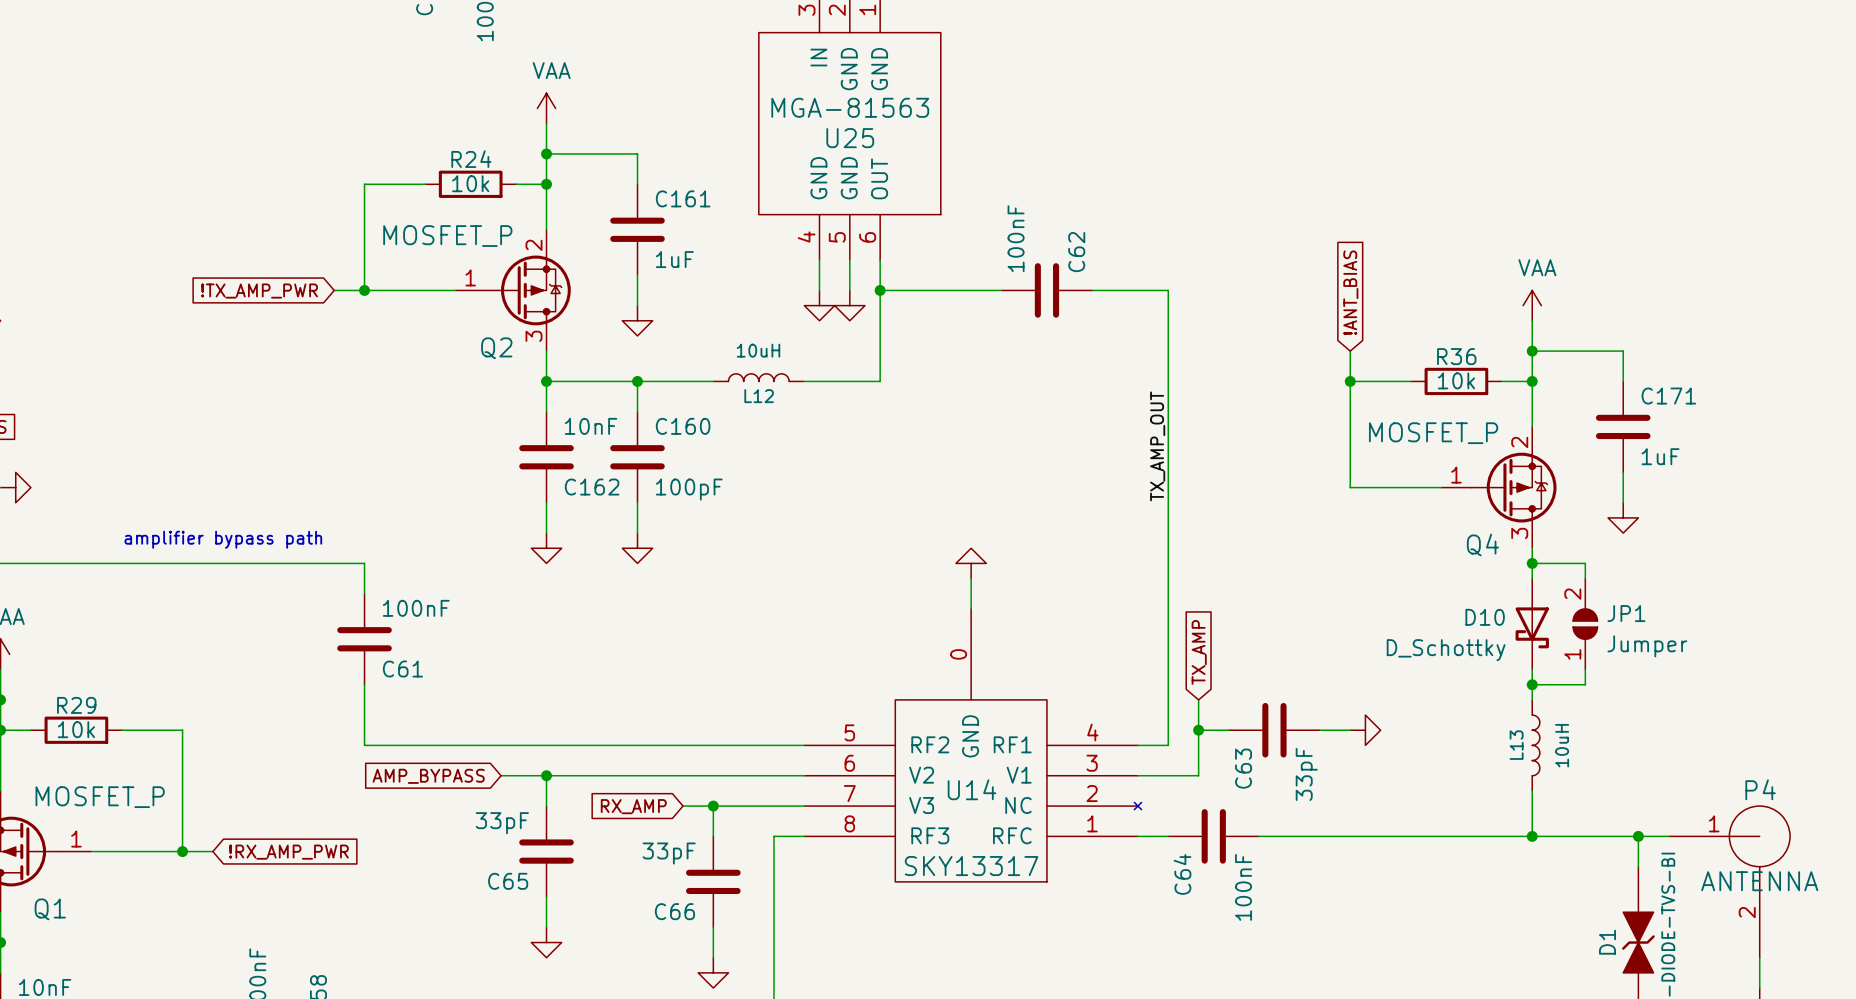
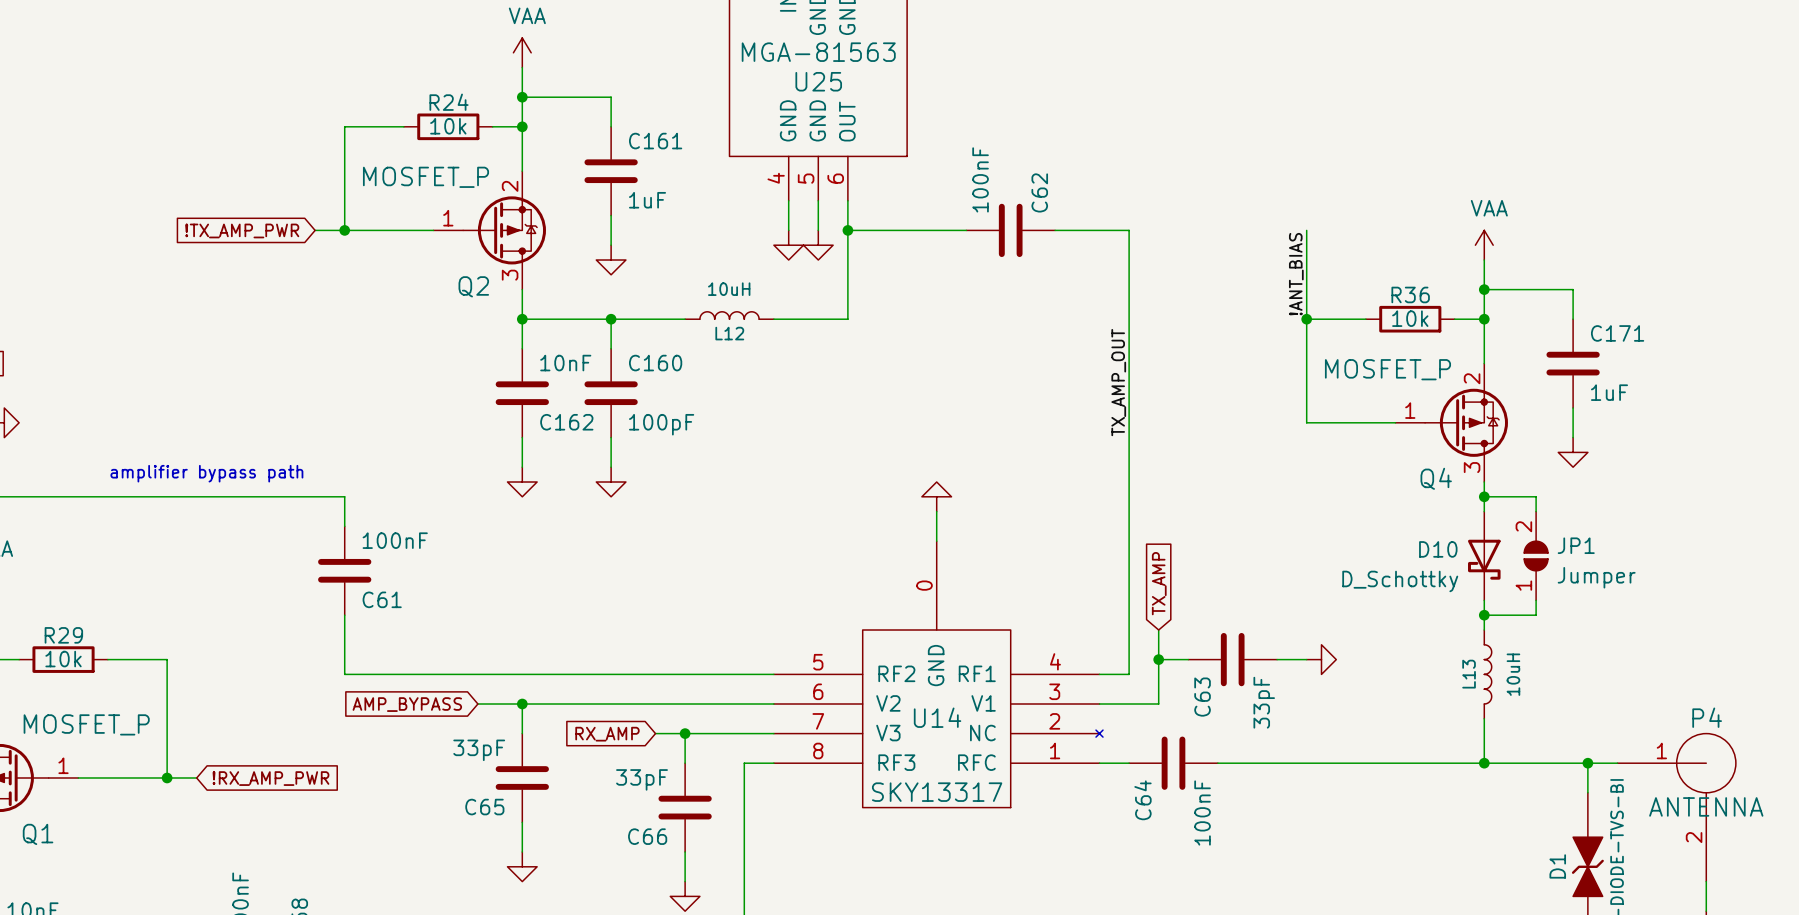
wire: none -> (1306, 230) (1306, 289)
global label: !ANT_BIAS (1350, 292) -> none
label: none -> !ANT_BIAS (1296, 274)

